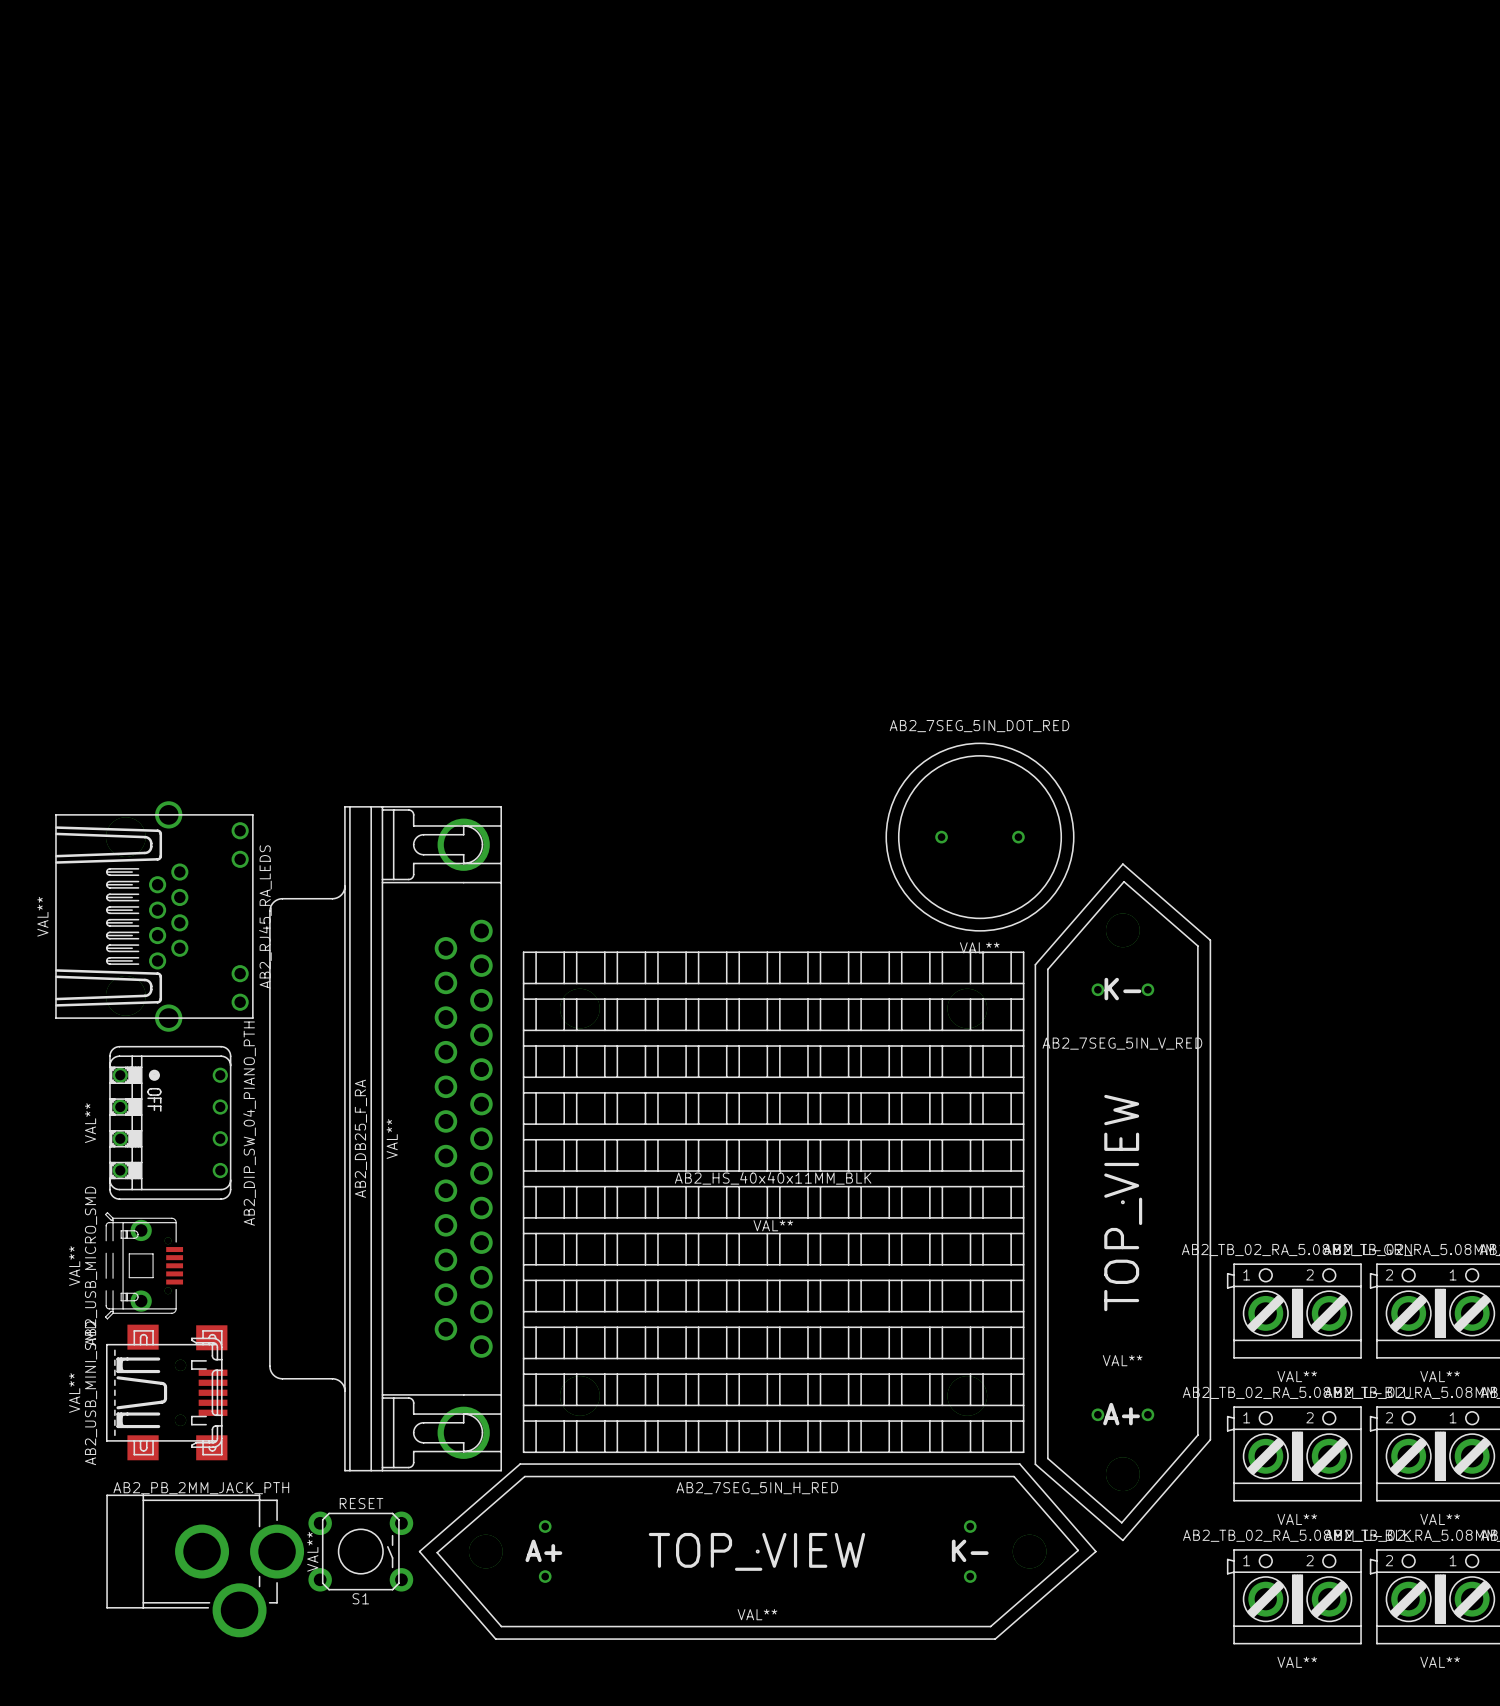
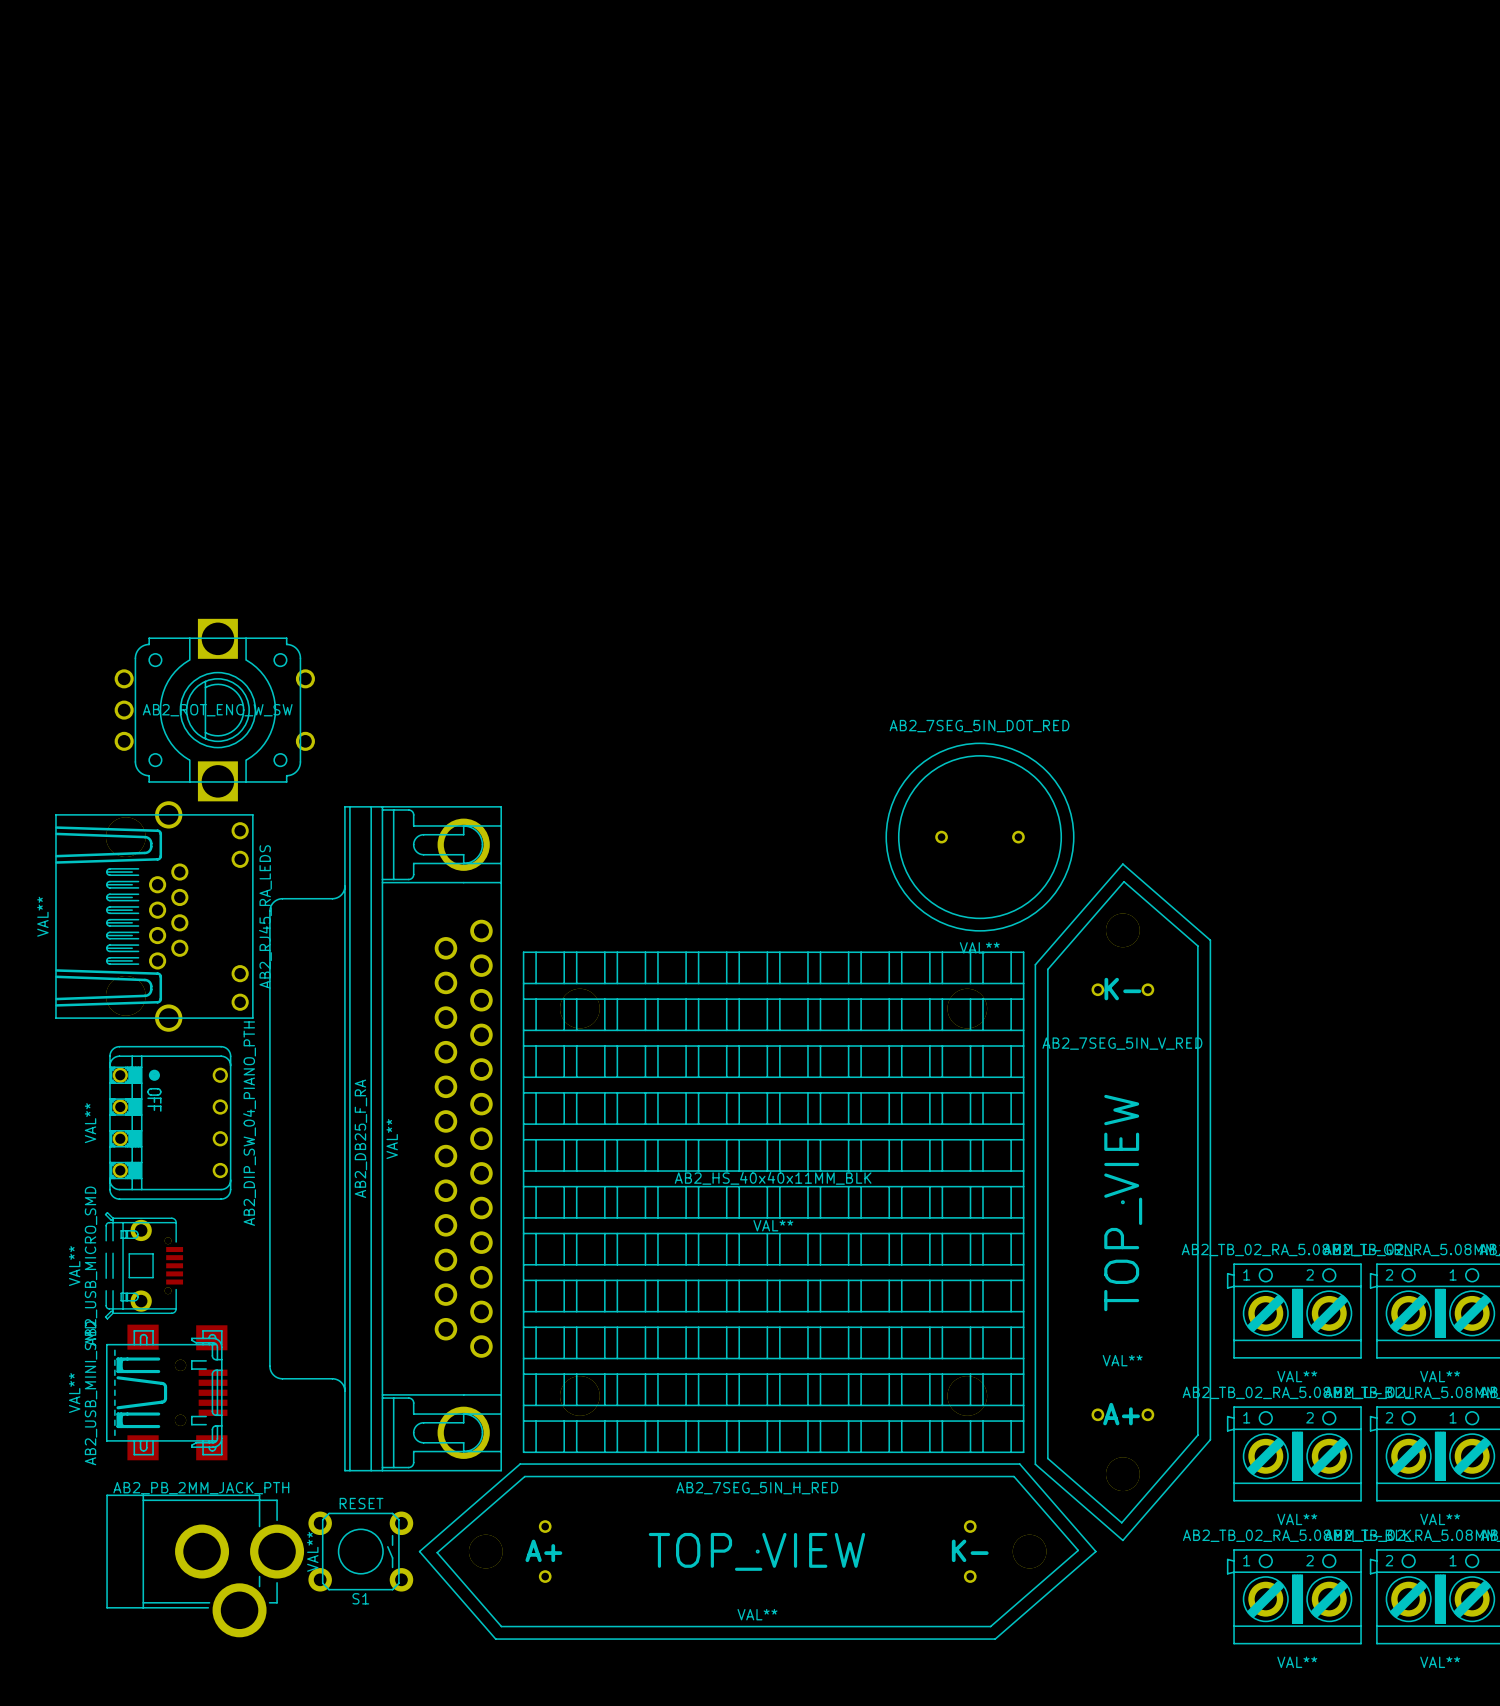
part: none -> AB2_ROT_ENC_W_SW (214, 710)

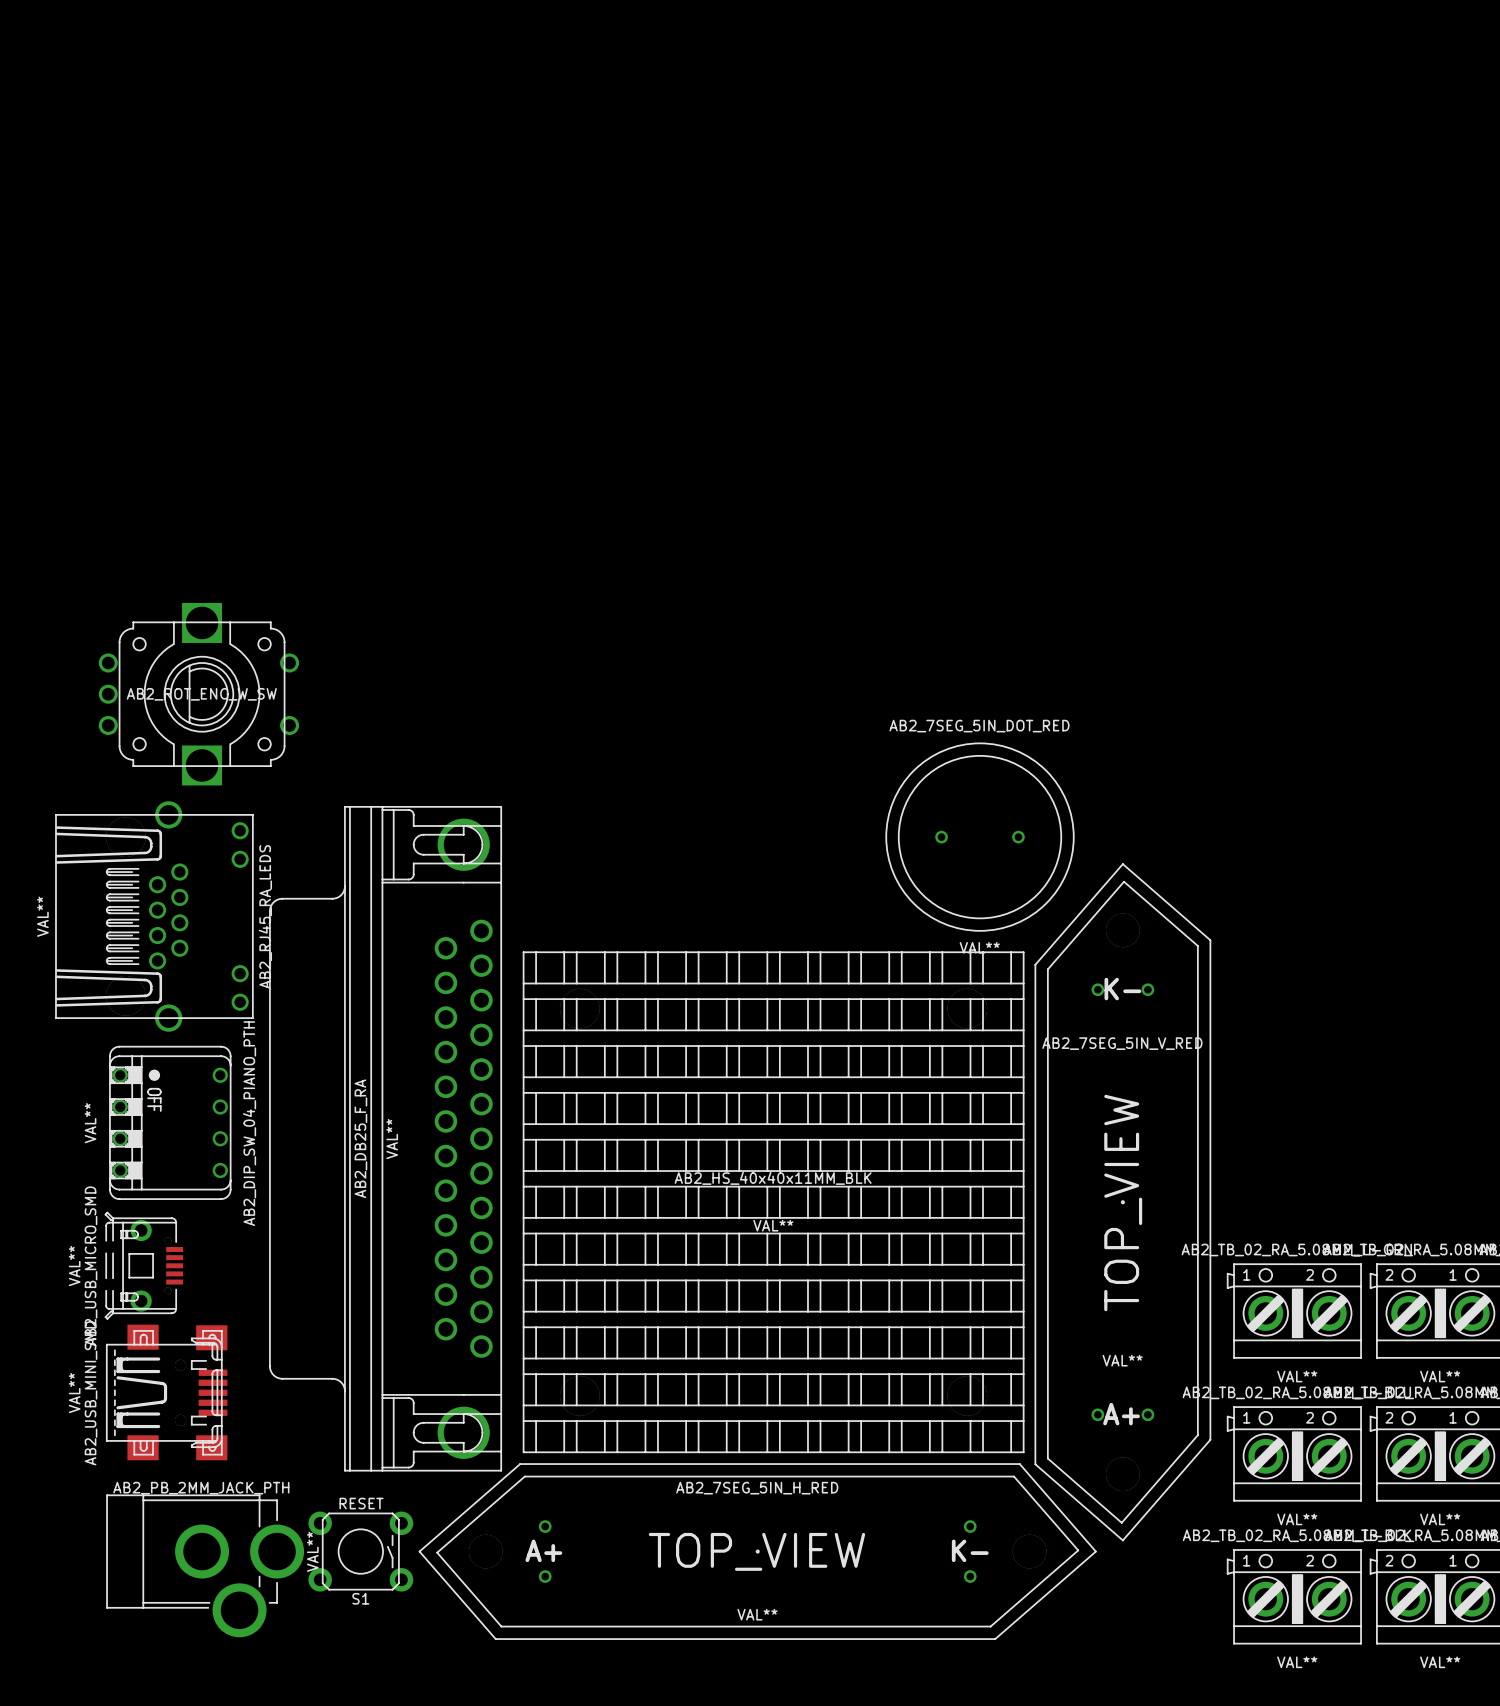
part position: (214, 710) -> (198, 694)

